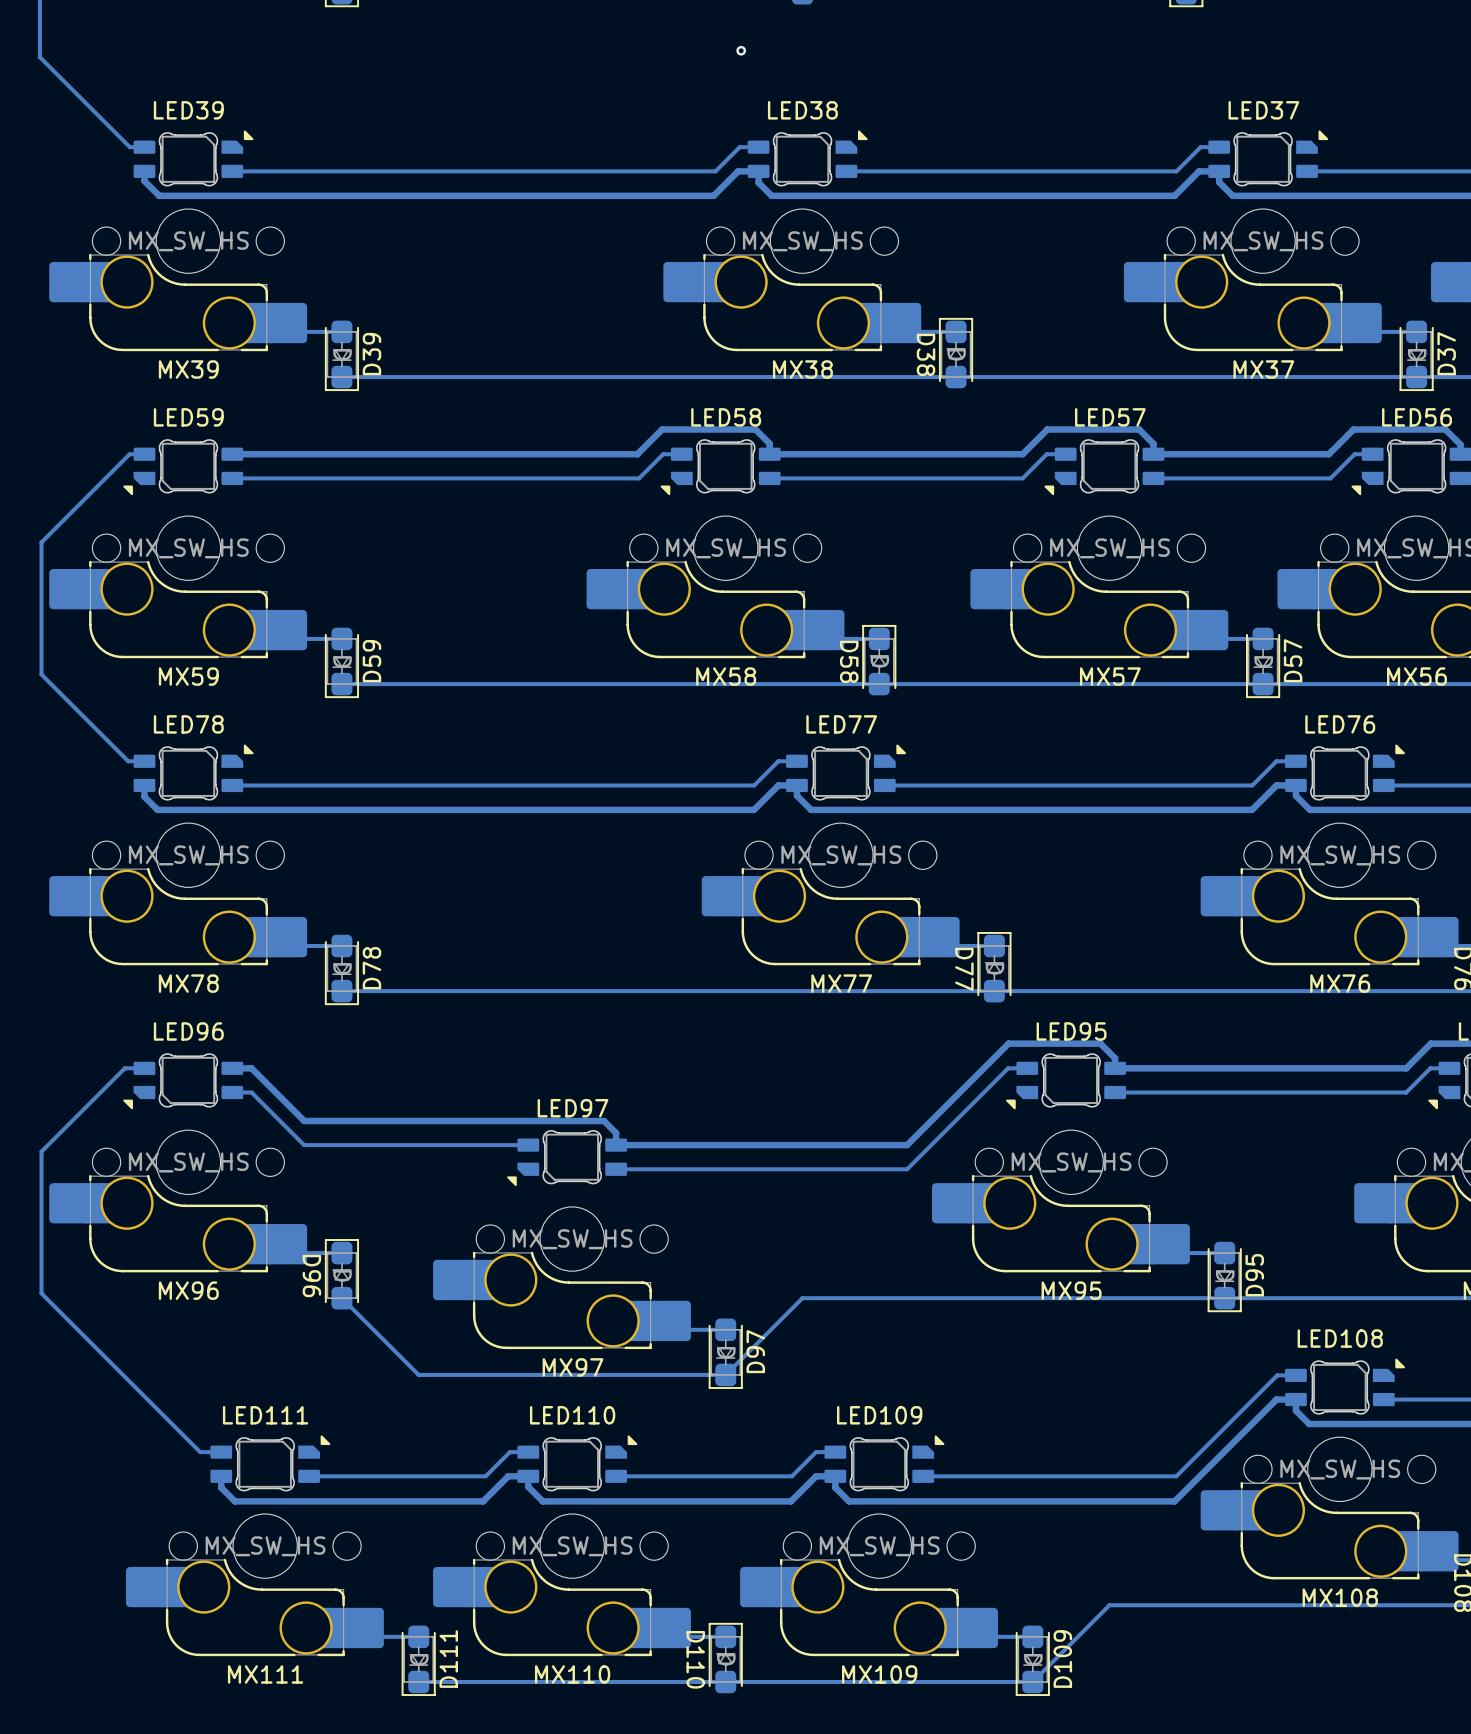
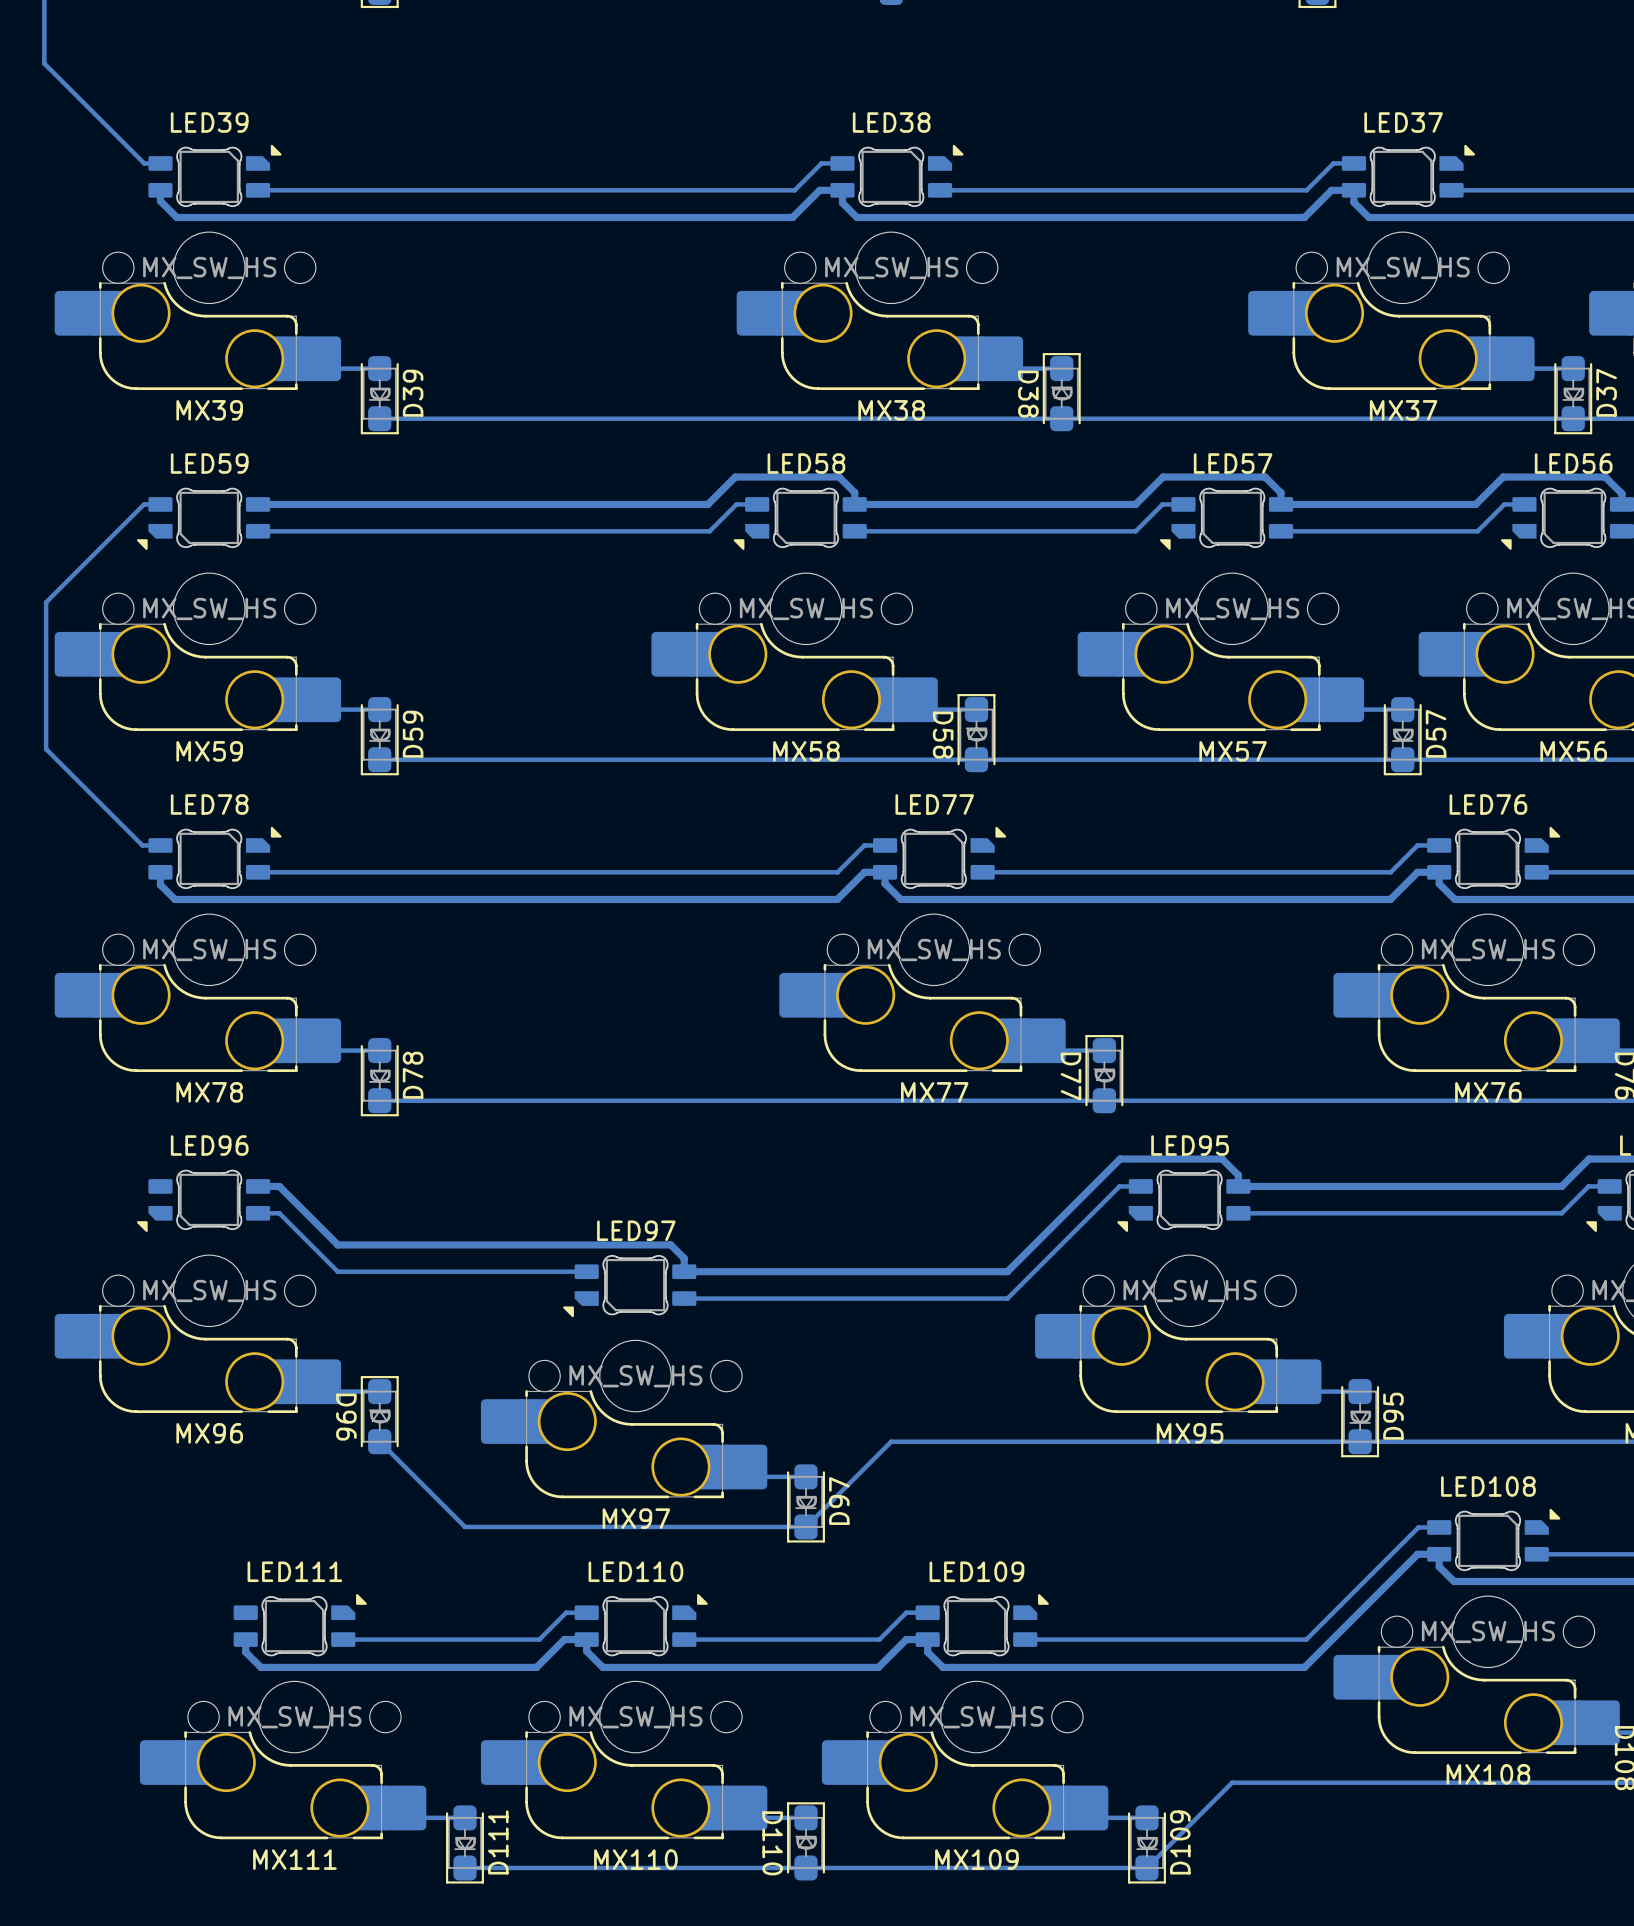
via: (741, 50) -> none
track: (144, 1068) (124, 1068) (41, 1151) (41, 1293) (200, 1452) (221, 1452) -> none

